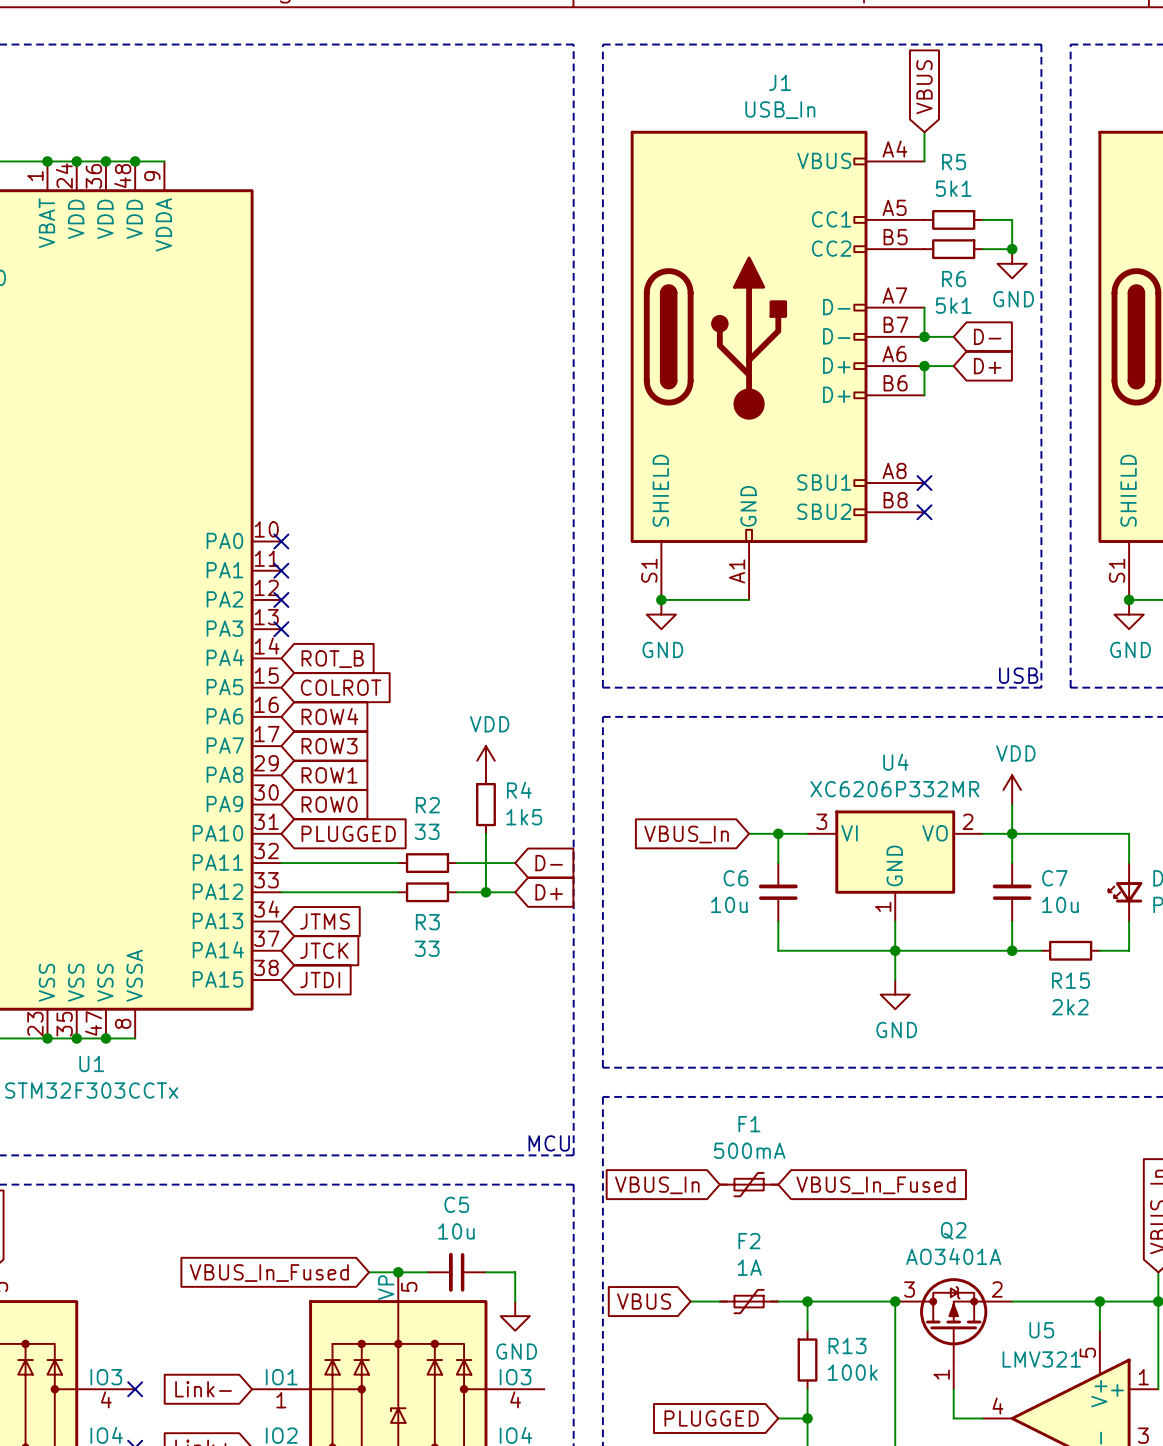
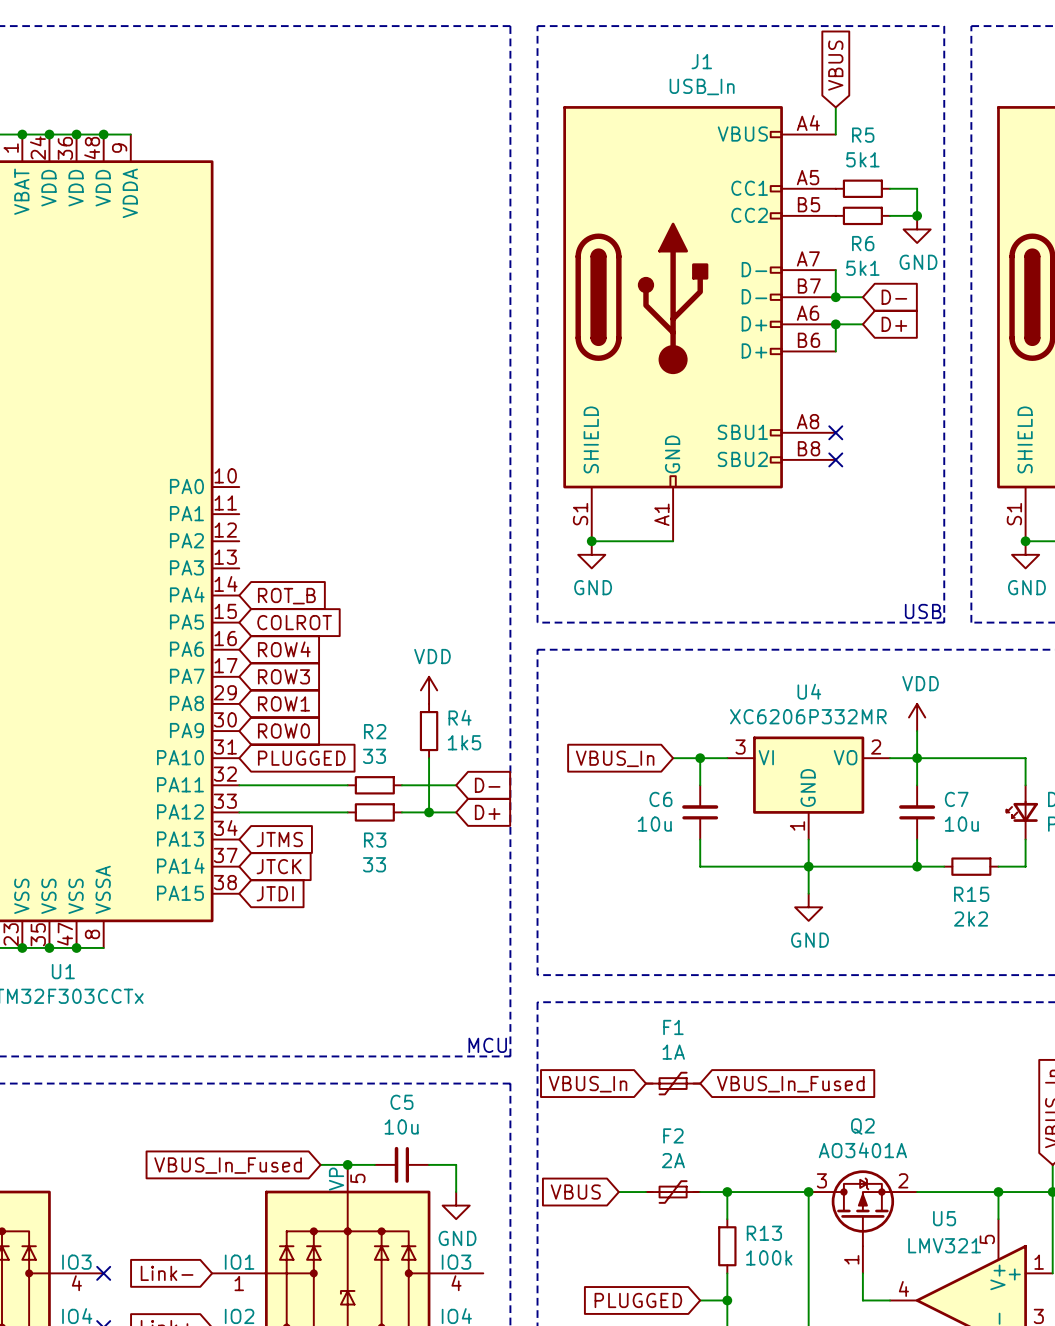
no-connect mark: (281, 541) -> none
no-connect mark: (281, 570) -> none
no-connect mark: (281, 599) -> none
no-connect mark: (281, 629) -> none
F1 value: 500mA (749, 1150) -> 1A (673, 1052)
F2 value: 1A (749, 1267) -> 2A (673, 1160)

